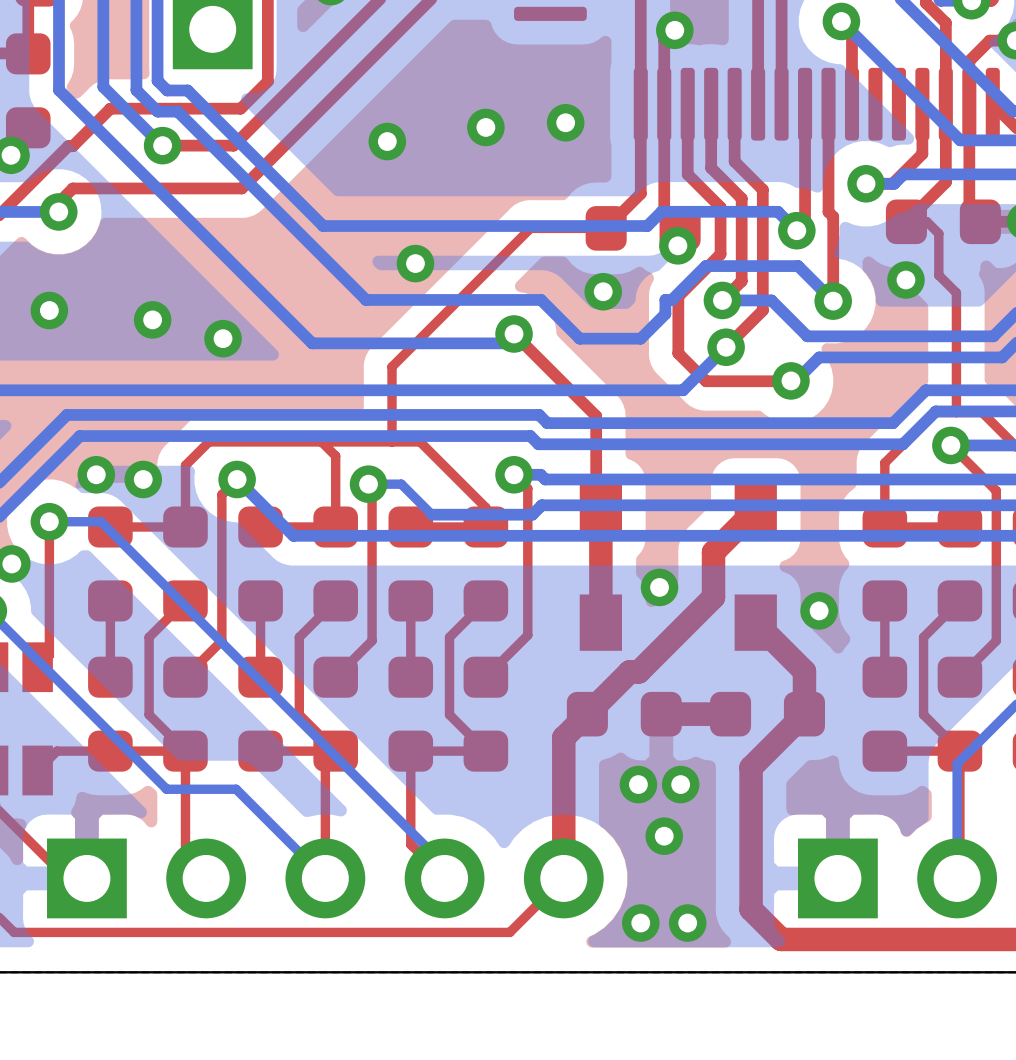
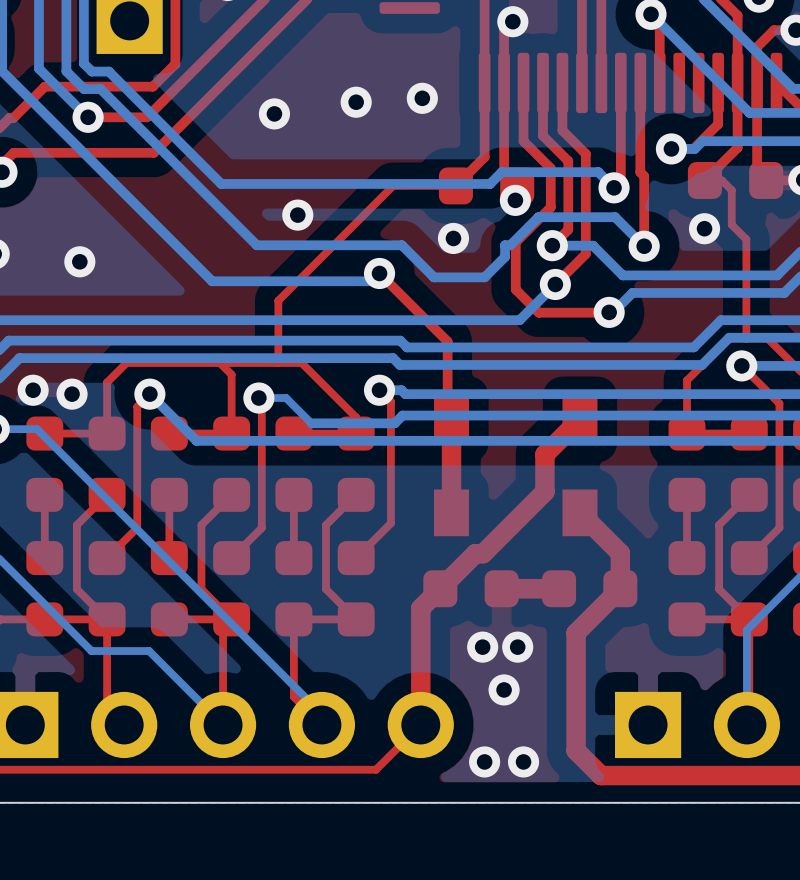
via: (223, 338) -> none
via: (659, 587) -> none
via: (819, 610) -> none

